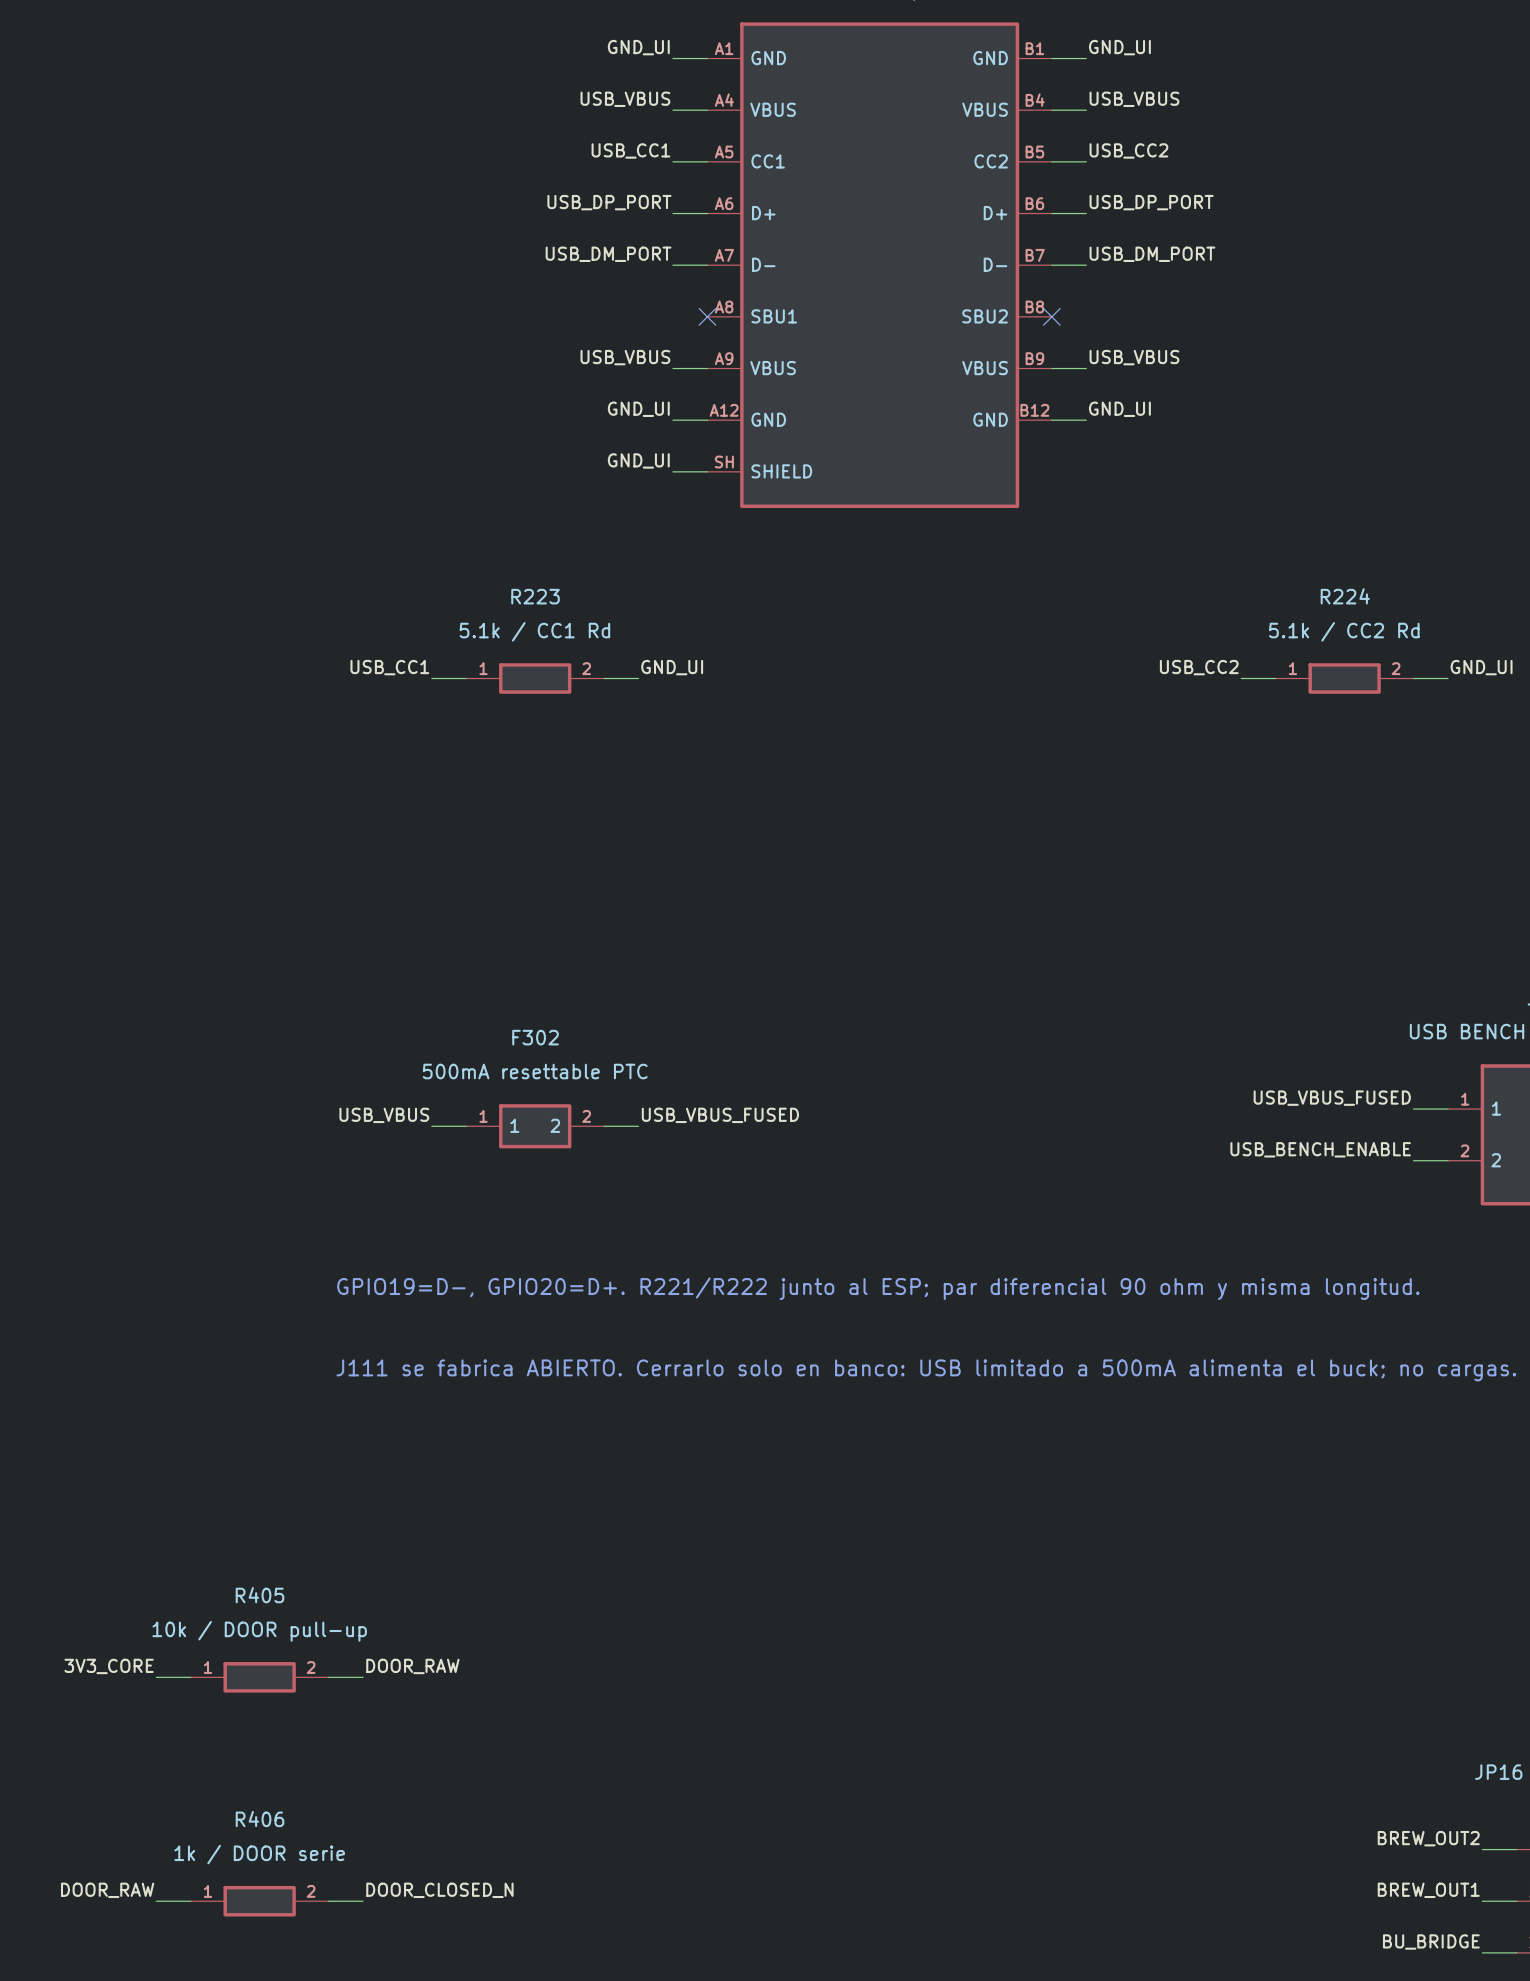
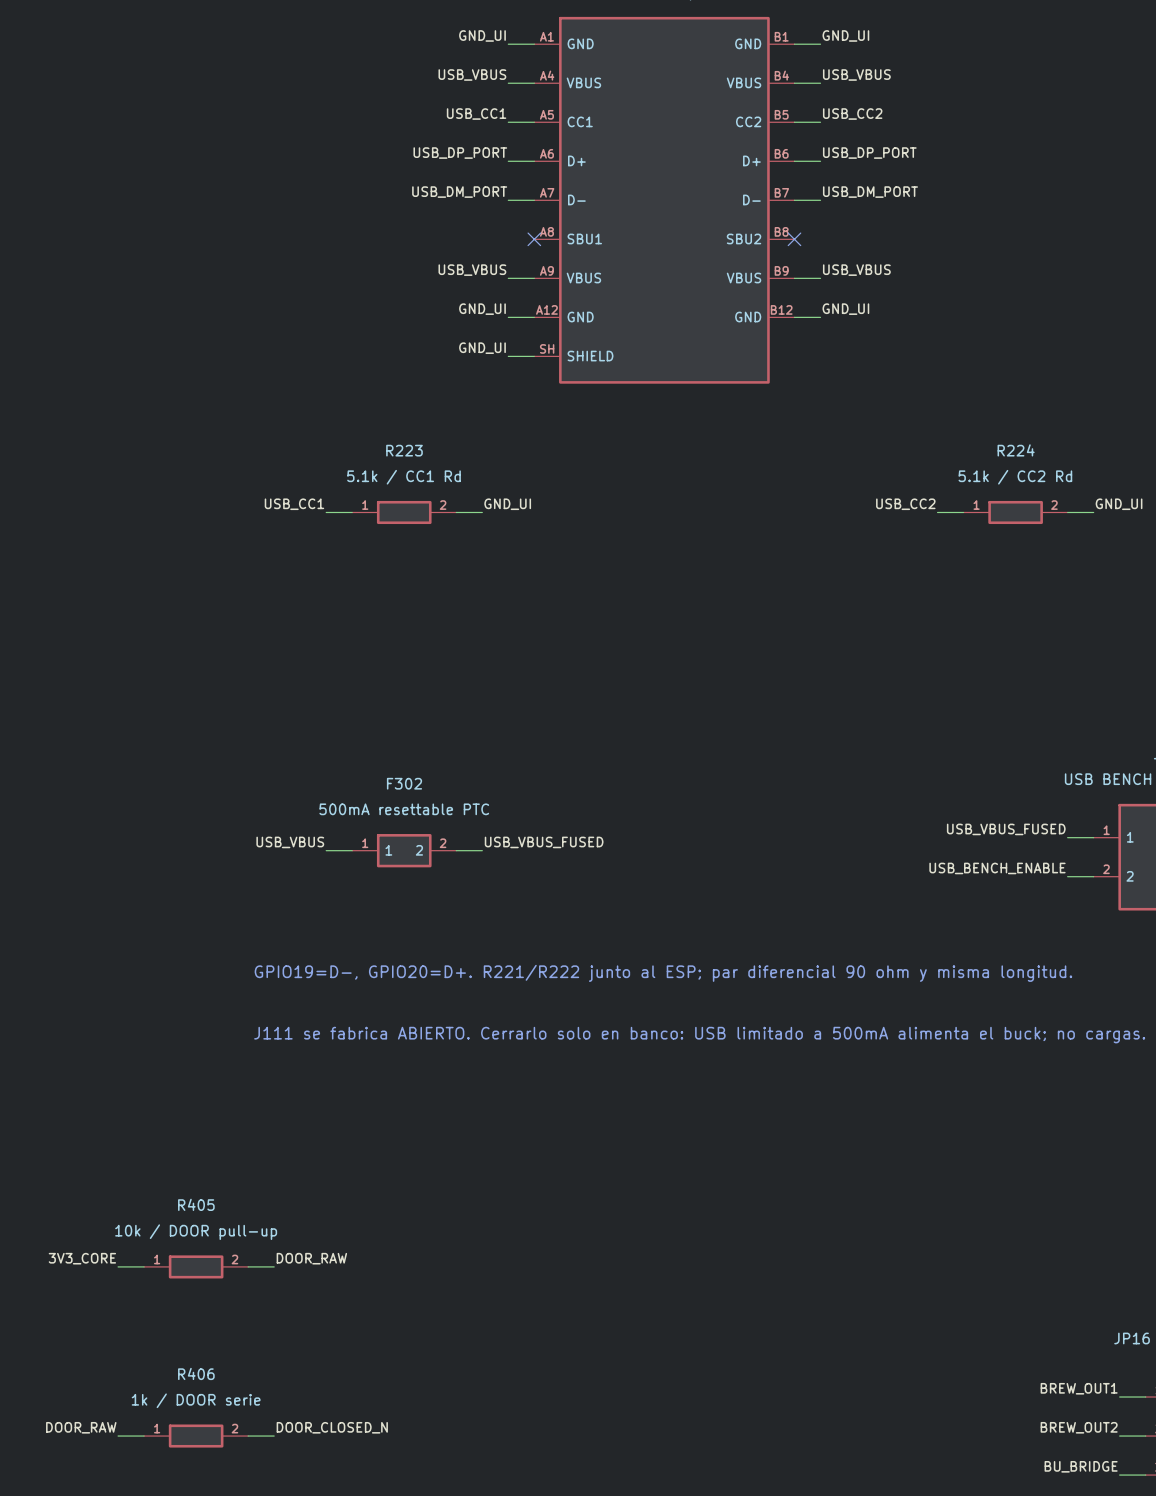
label: BREW_OUT2 (1428, 1838) -> BREW_OUT1 (1079, 1388)
label: BREW_OUT1 (1428, 1890) -> BREW_OUT2 (1079, 1427)

